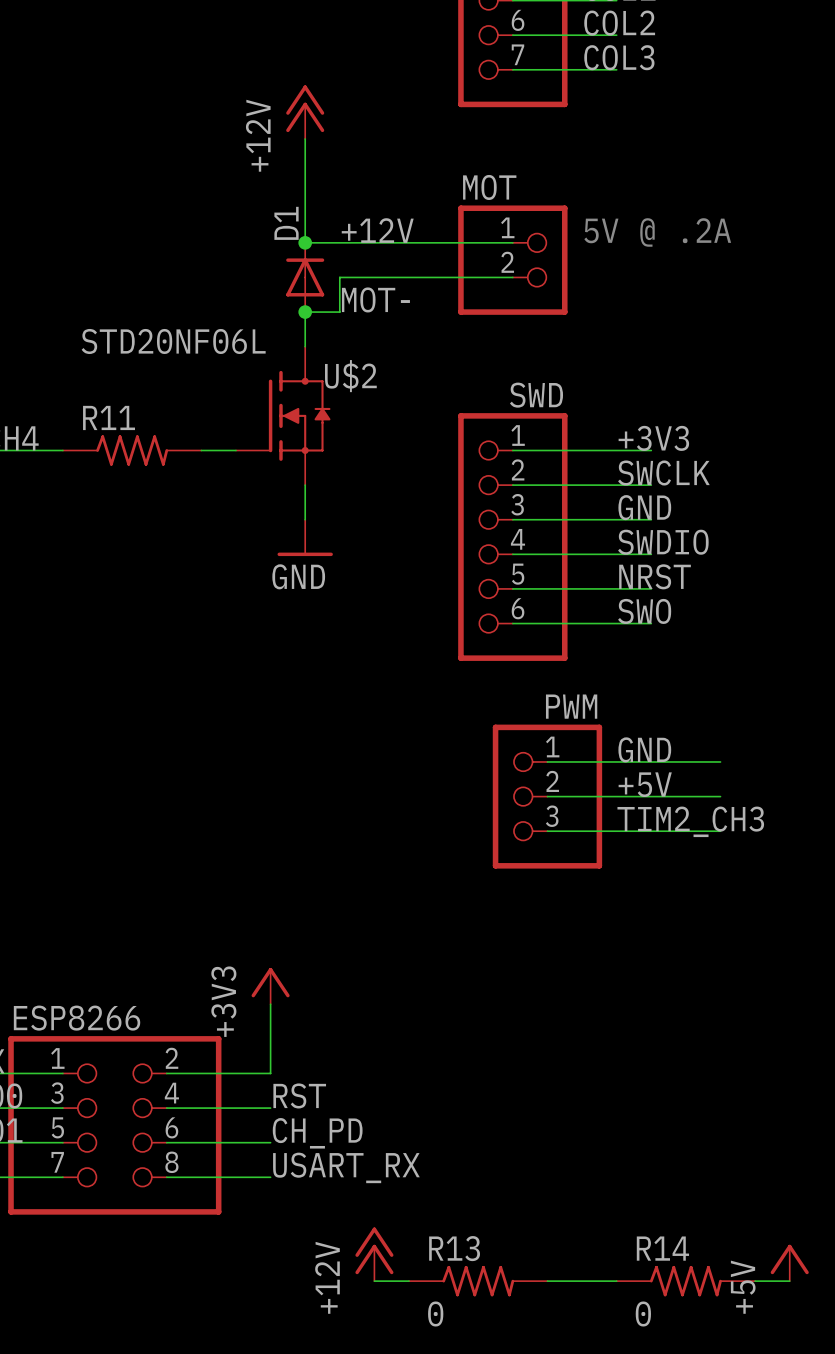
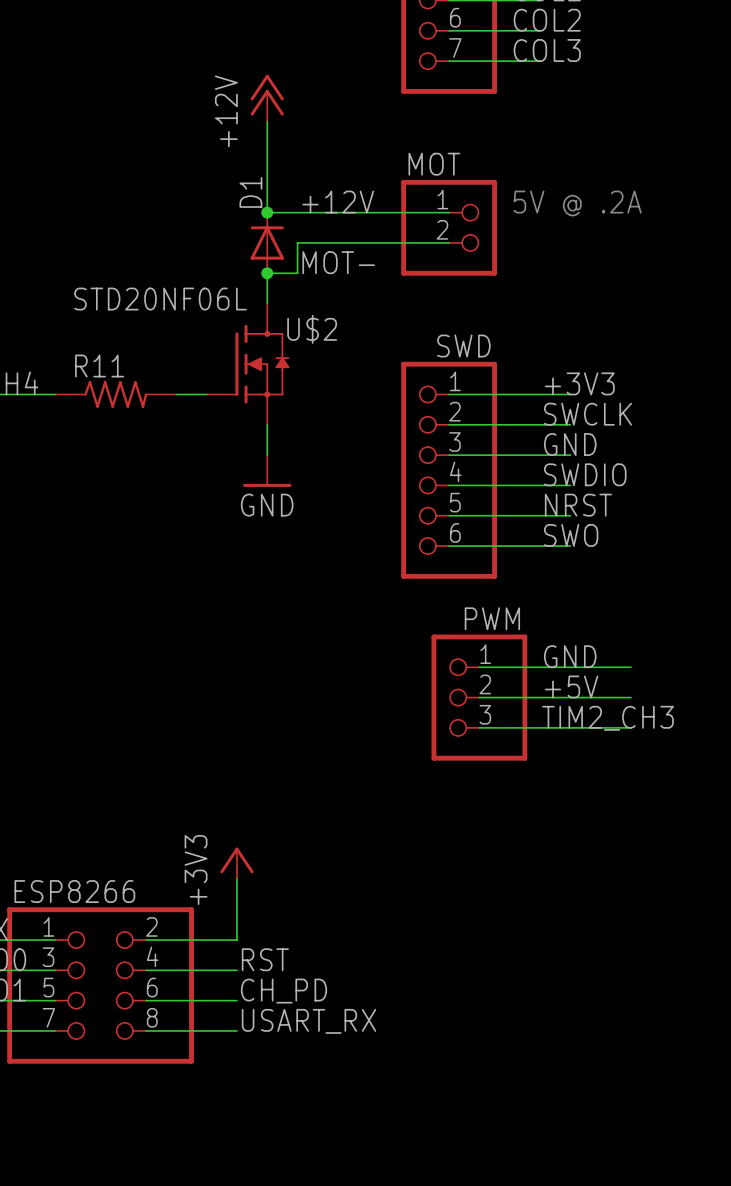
power symbol: +12V (374, 1254) -> none
power symbol: +5V (789, 1262) -> none
wire: (374, 1281) (409, 1281) -> none
R13: 0 (478, 1281) -> none
wire: (547, 1281) (616, 1281) -> none
R14: 0 (685, 1281) -> none
wire: (755, 1281) (789, 1281) -> none

